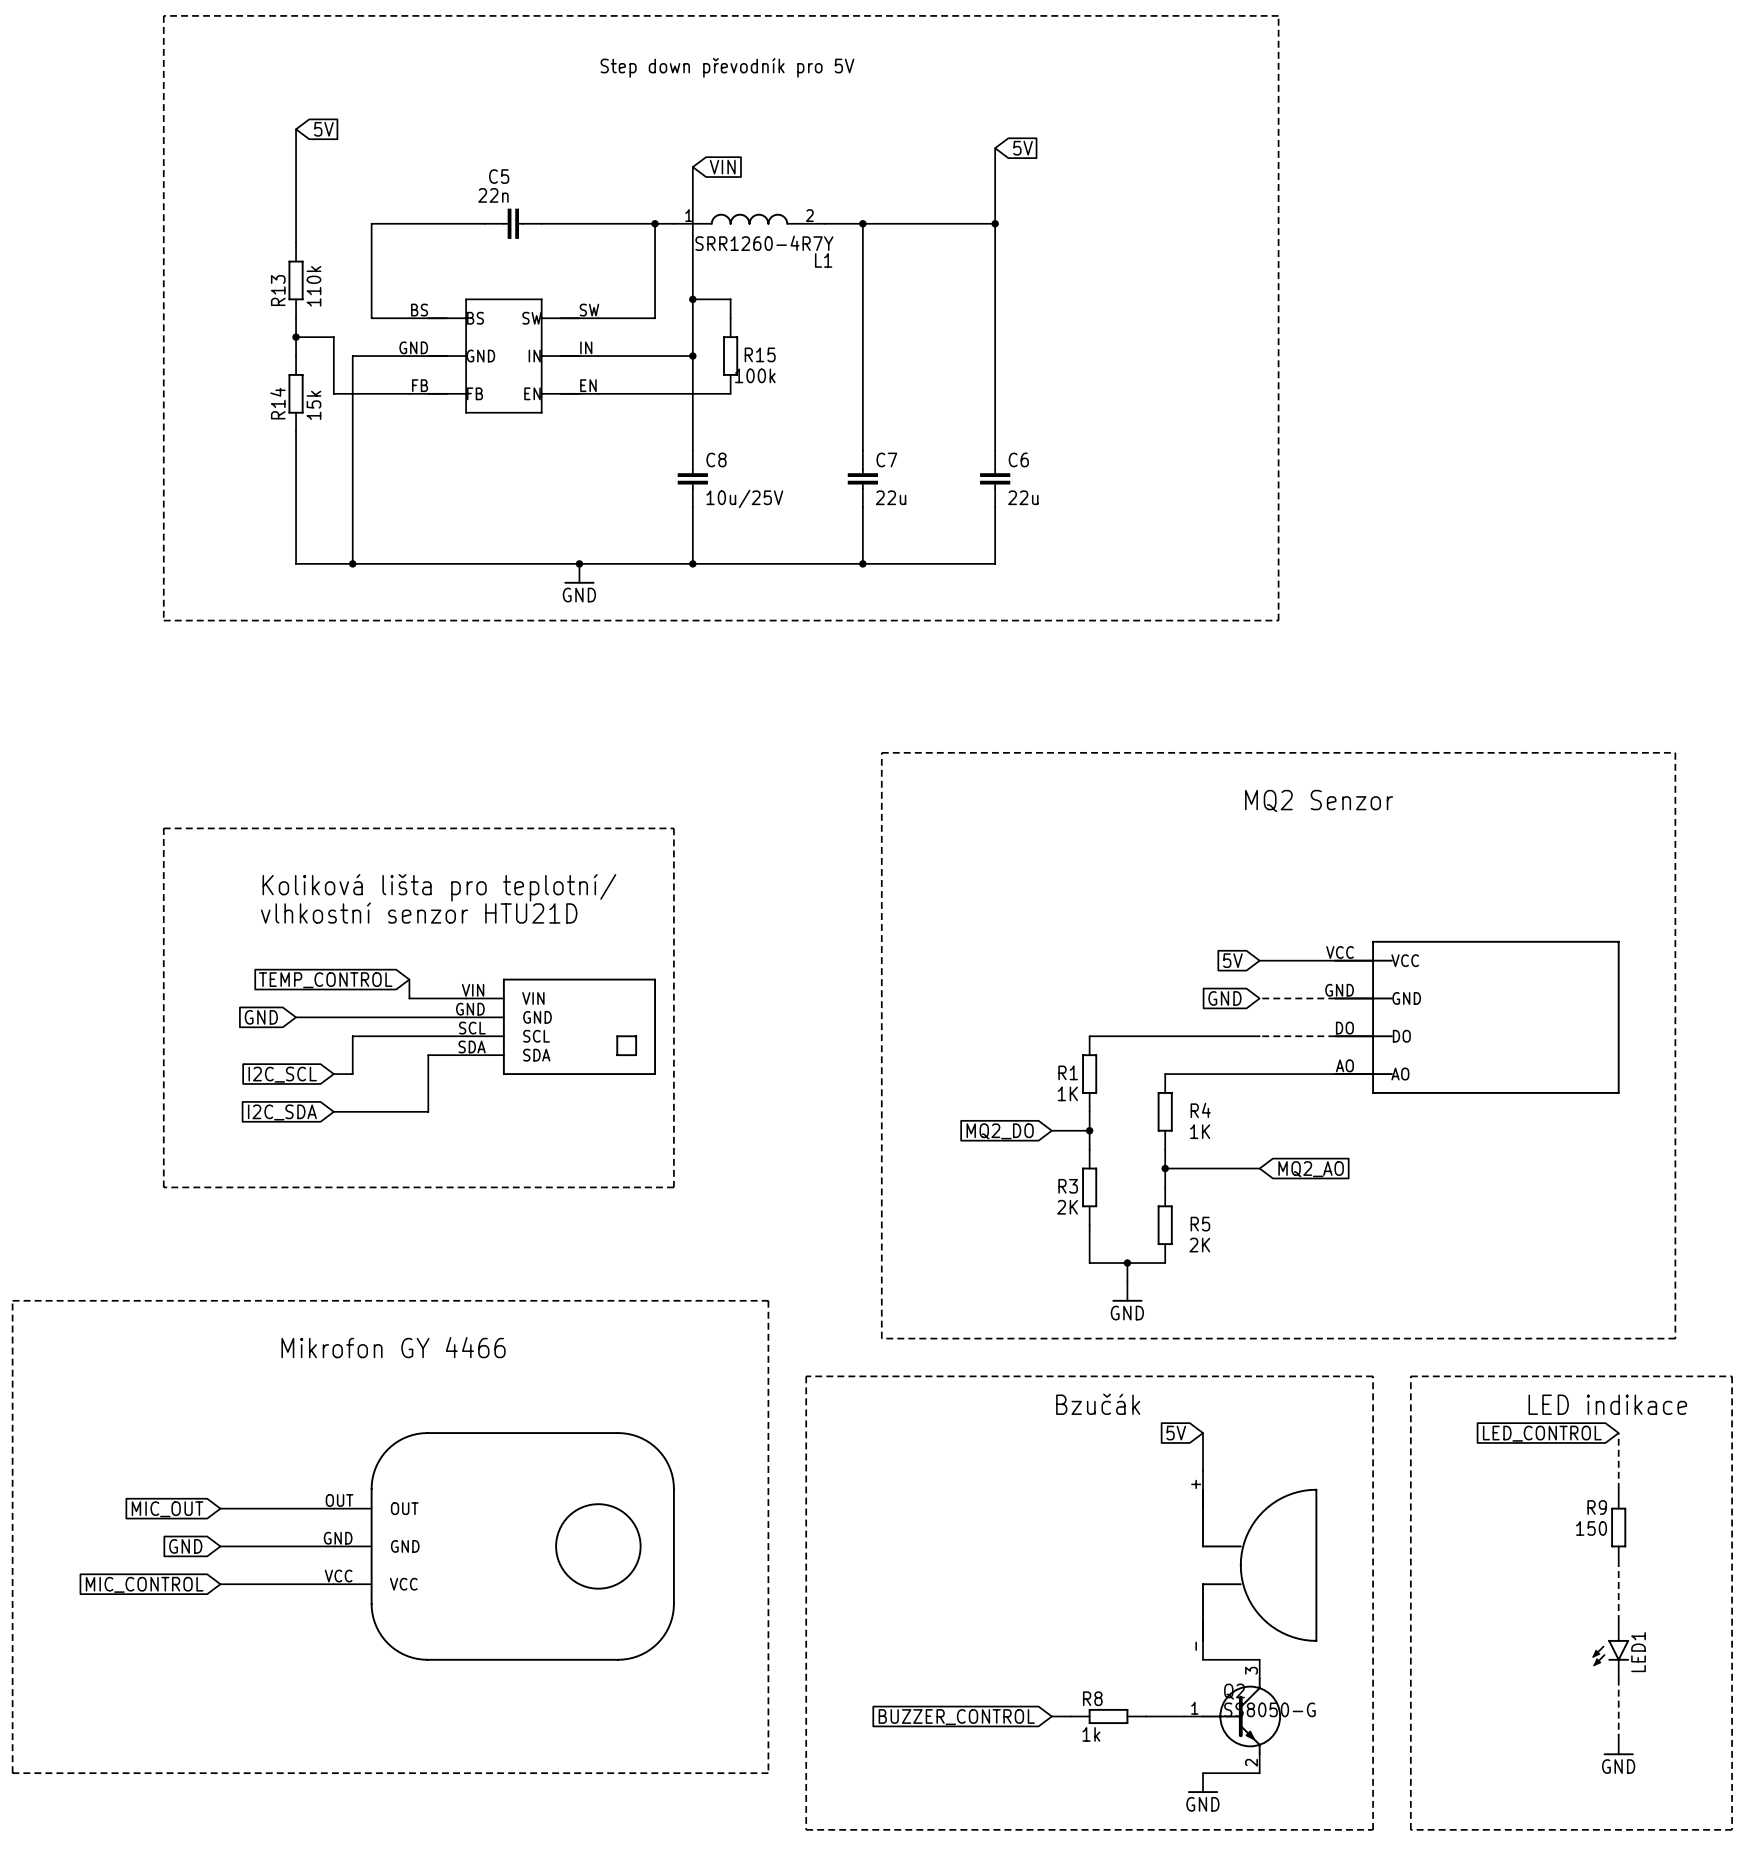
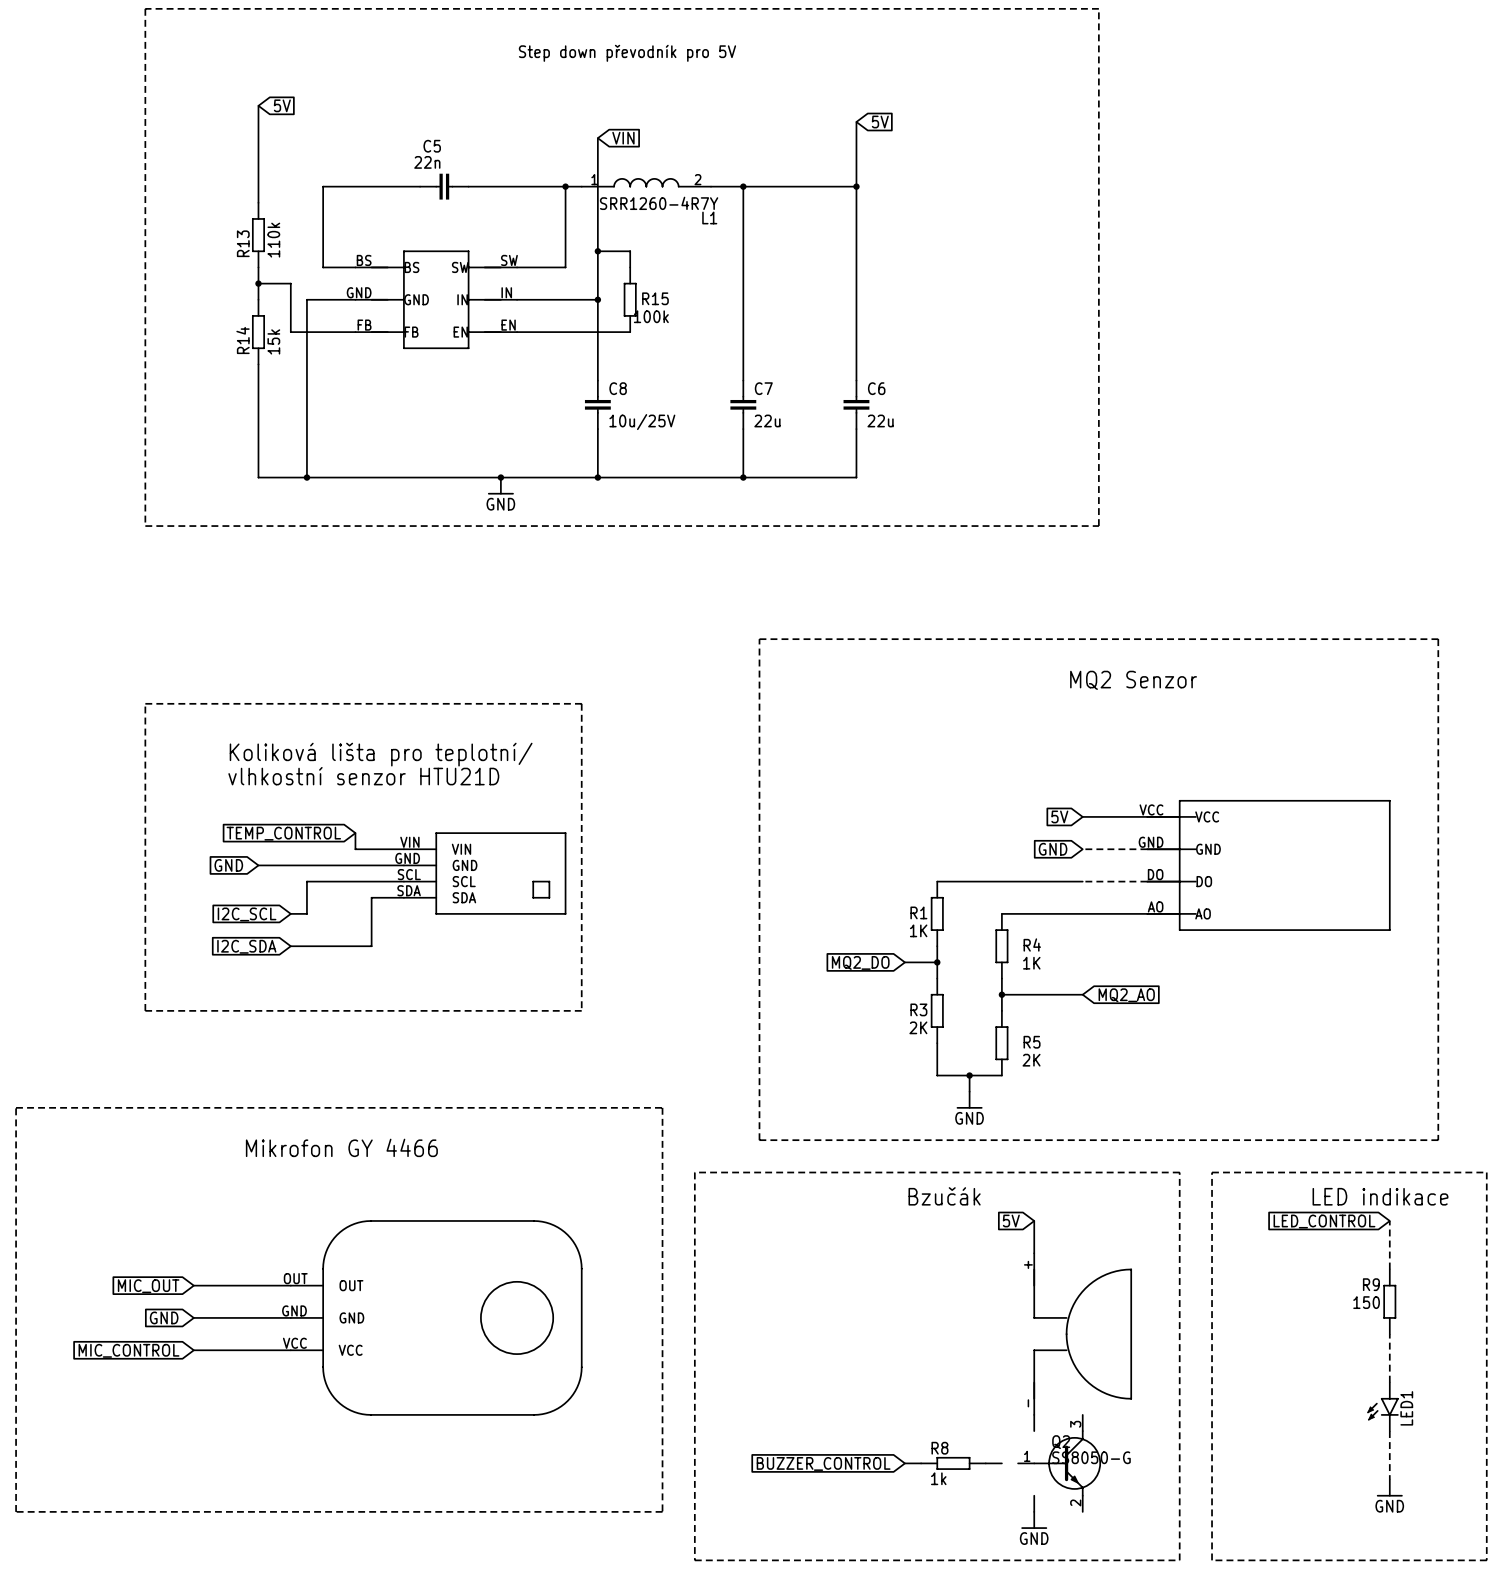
wire: (1203, 1659) (1259, 1659) -> (1034, 1414) (1034, 1431)
wire: (1165, 1716) (1184, 1716) -> none
wire: (1203, 1773) (1259, 1773) -> (1034, 1511) (1034, 1495)

